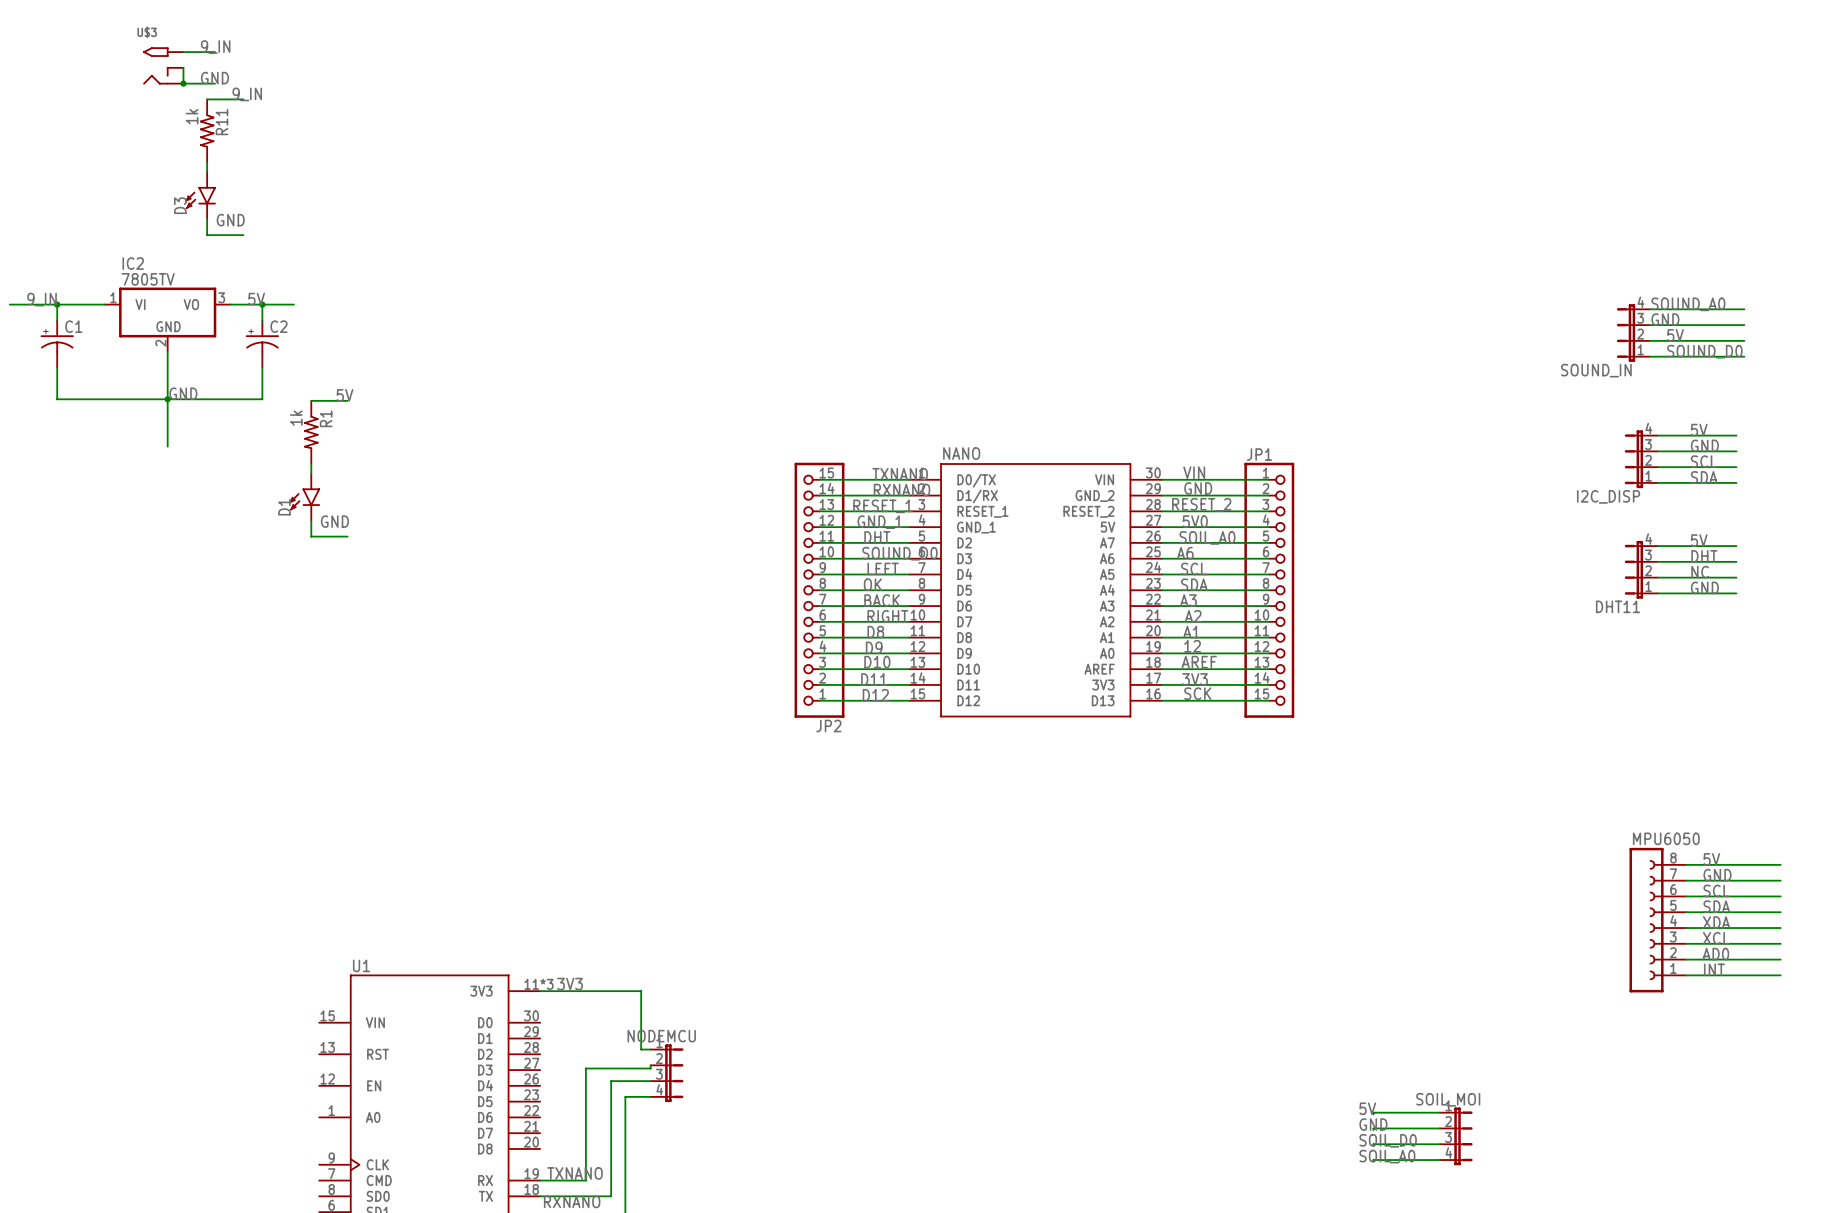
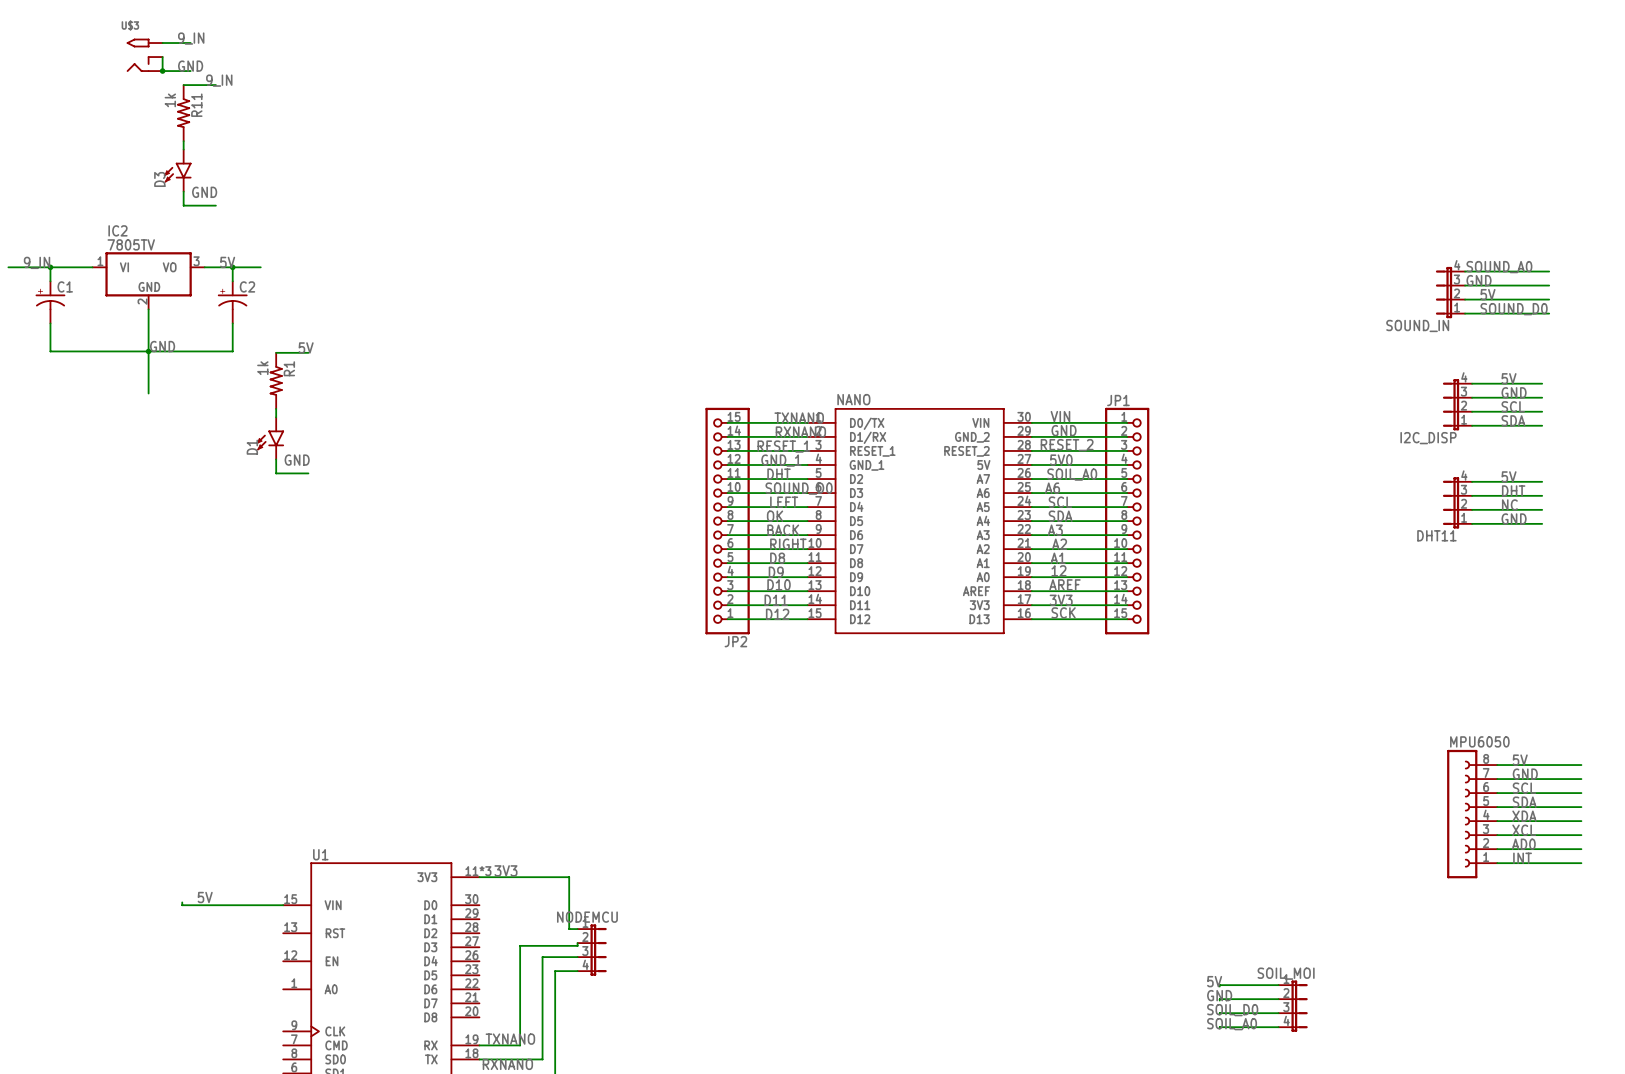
label: none -> 5V (205, 897)
wire: none -> (182, 902) (182, 905) (283, 905)

